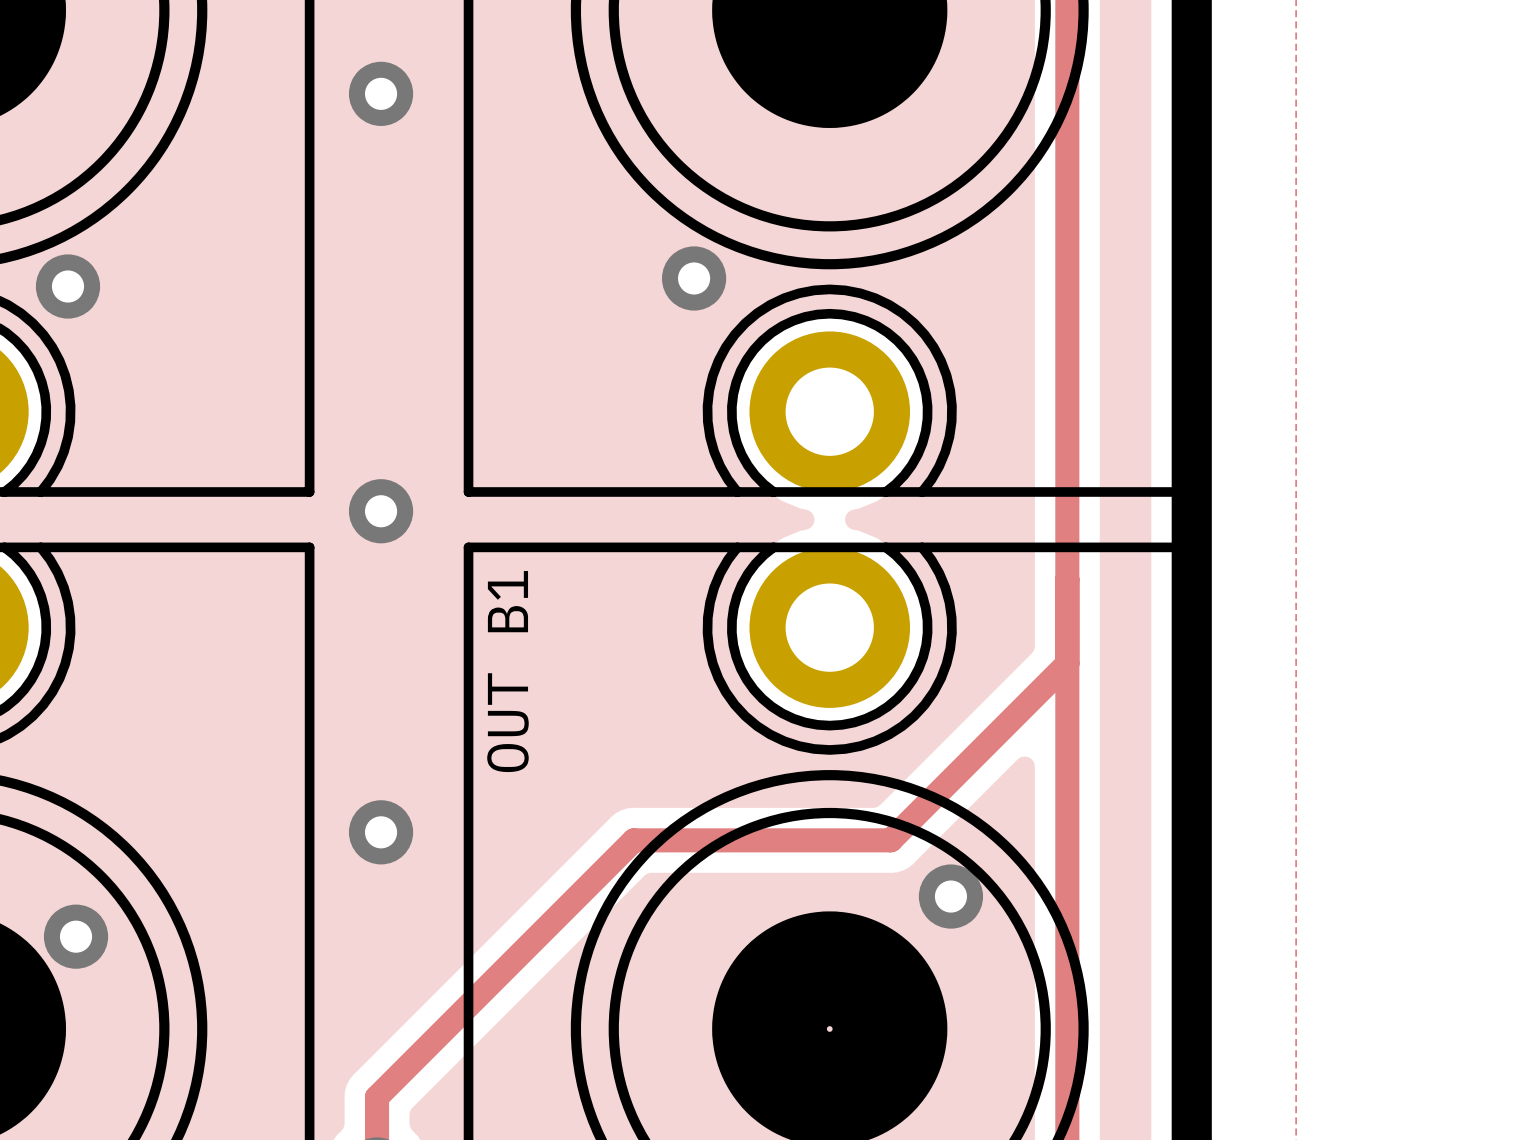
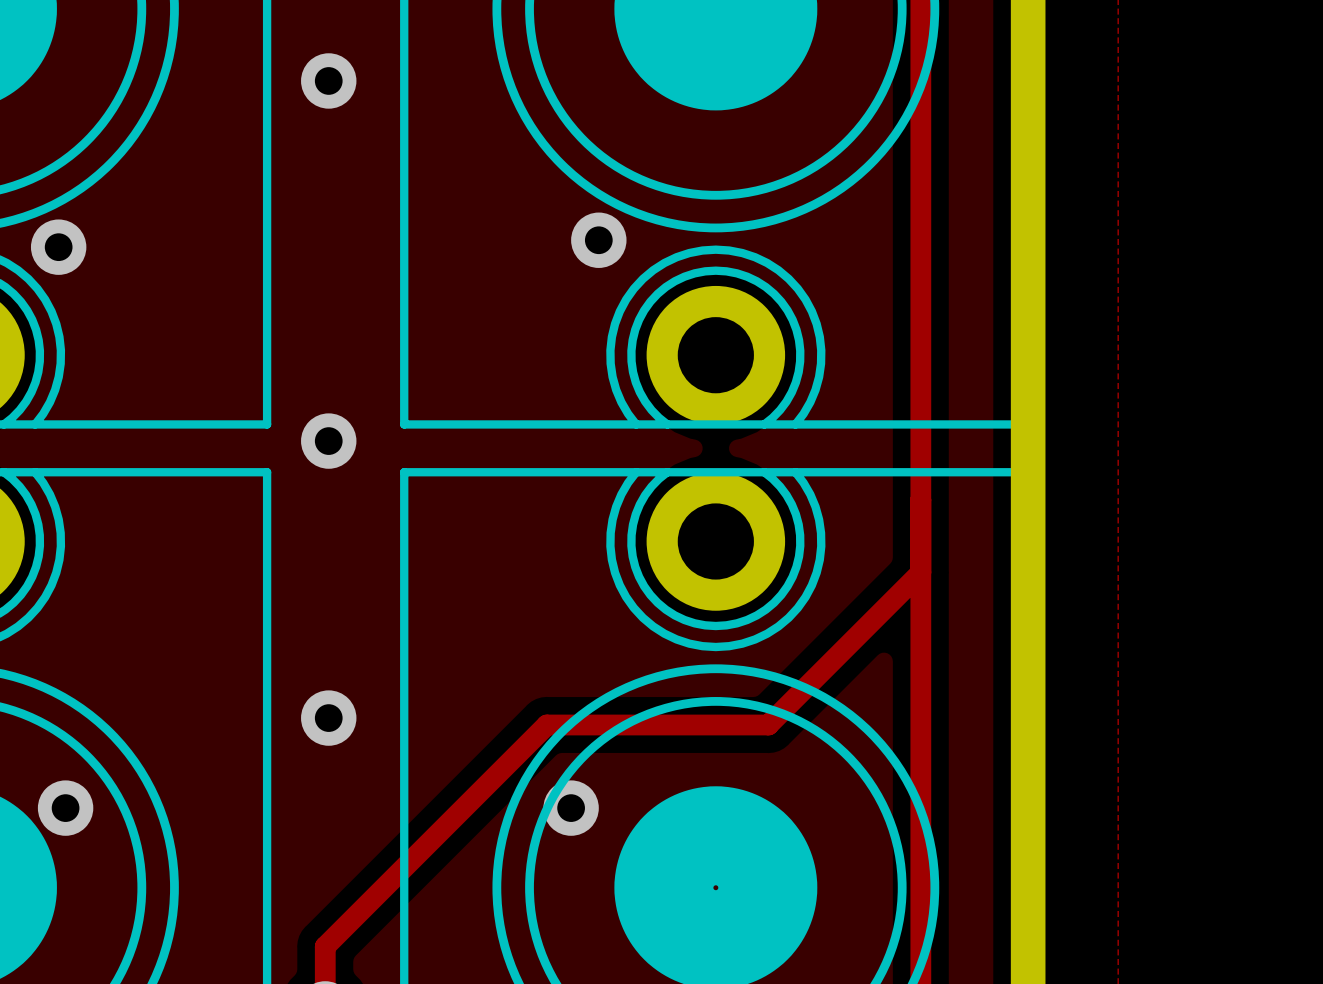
part value: OUT B1 (507, 671) -> none
via position: (950, 896) -> (571, 808)

